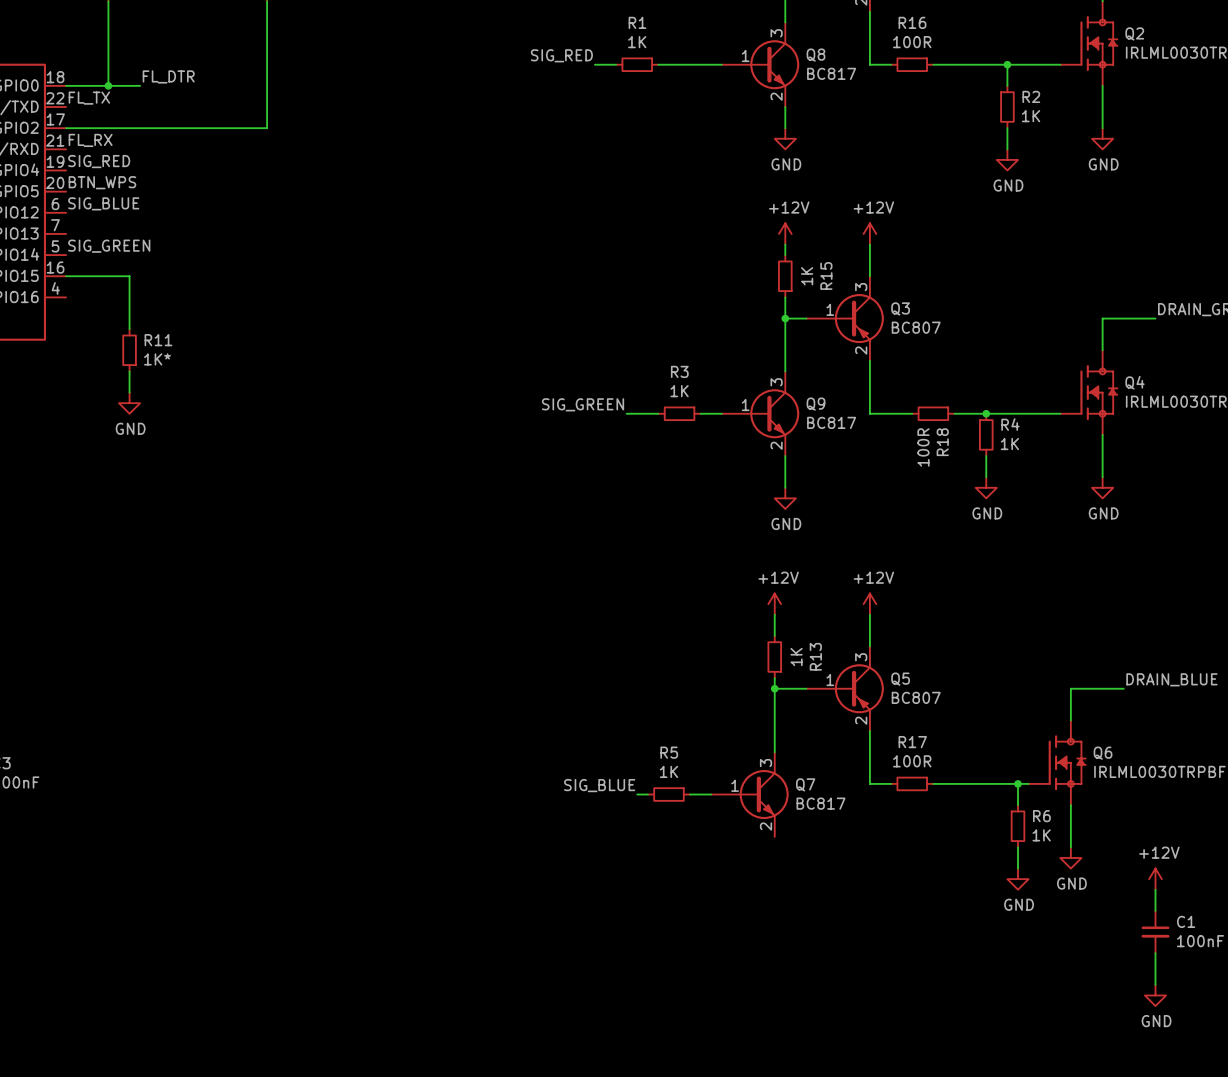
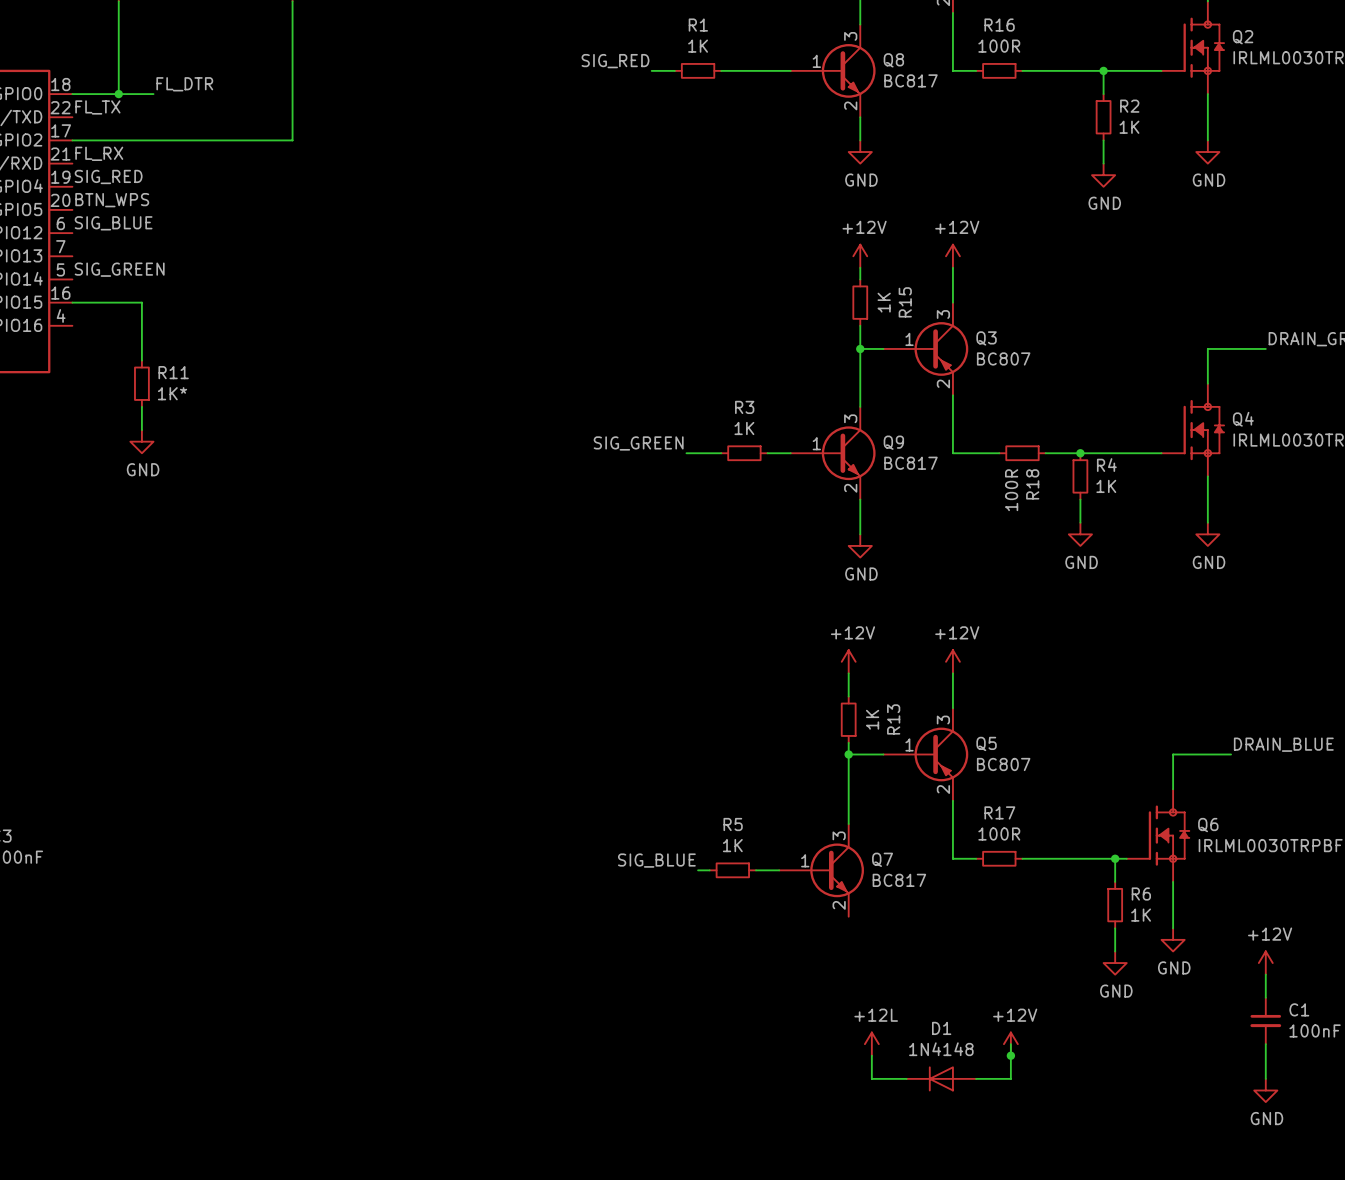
power symbol: none -> +12L (871, 1044)
wire: none -> (1010, 1044) (1010, 1078) (976, 1078)
power symbol: none -> +12V (1010, 1044)
wire: none -> (871, 1055) (871, 1078) (906, 1078)
junction: none -> (1010, 1055)
D1: none -> 1N4148 (941, 1078)

